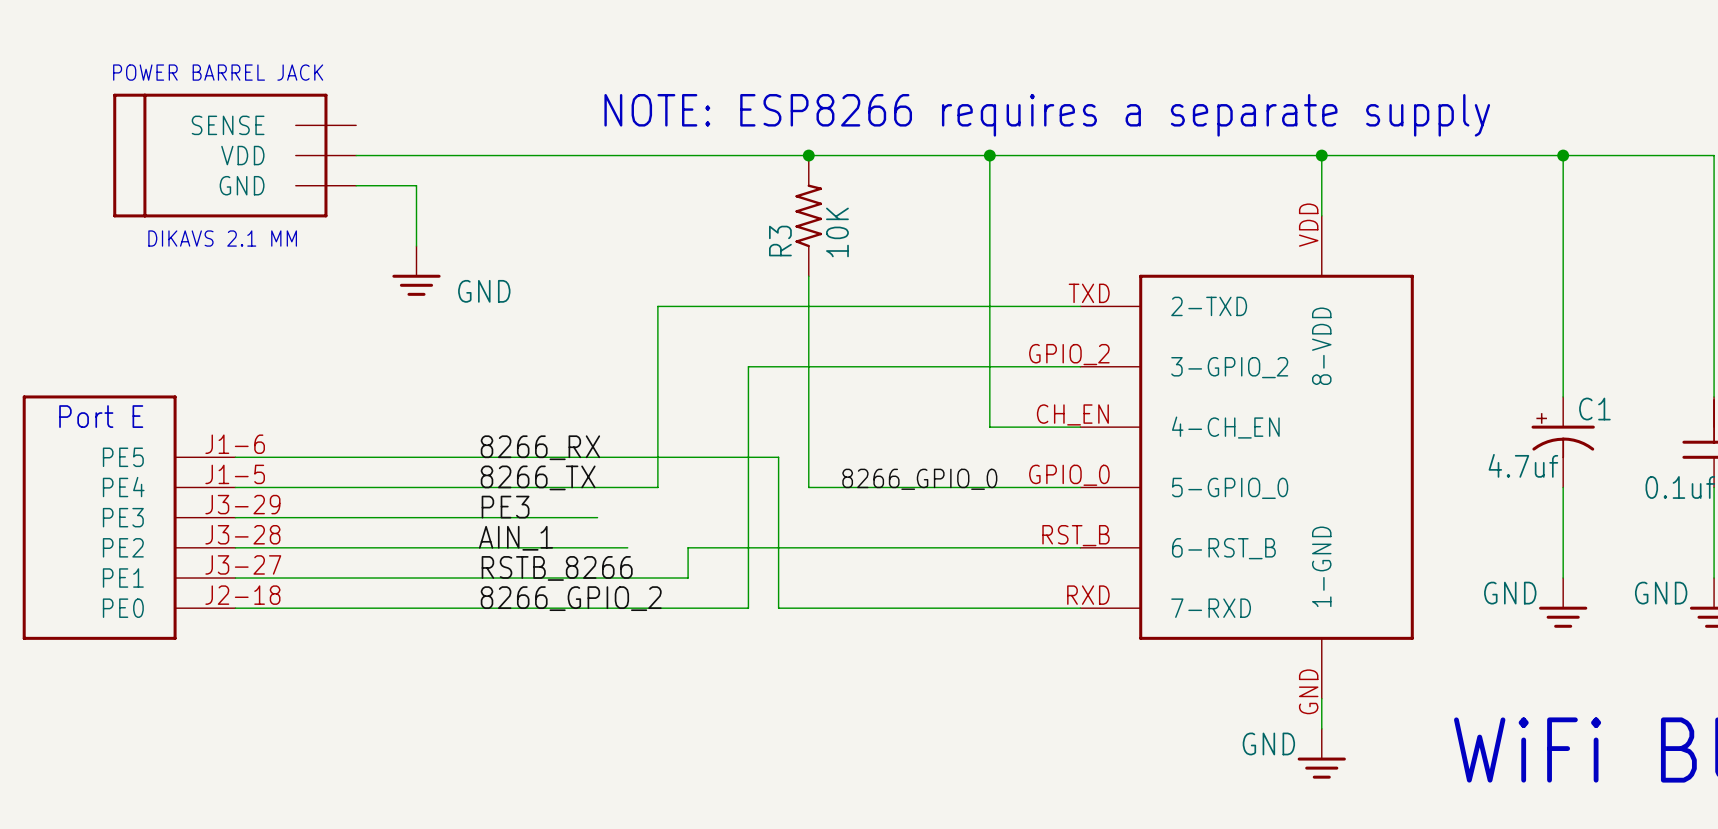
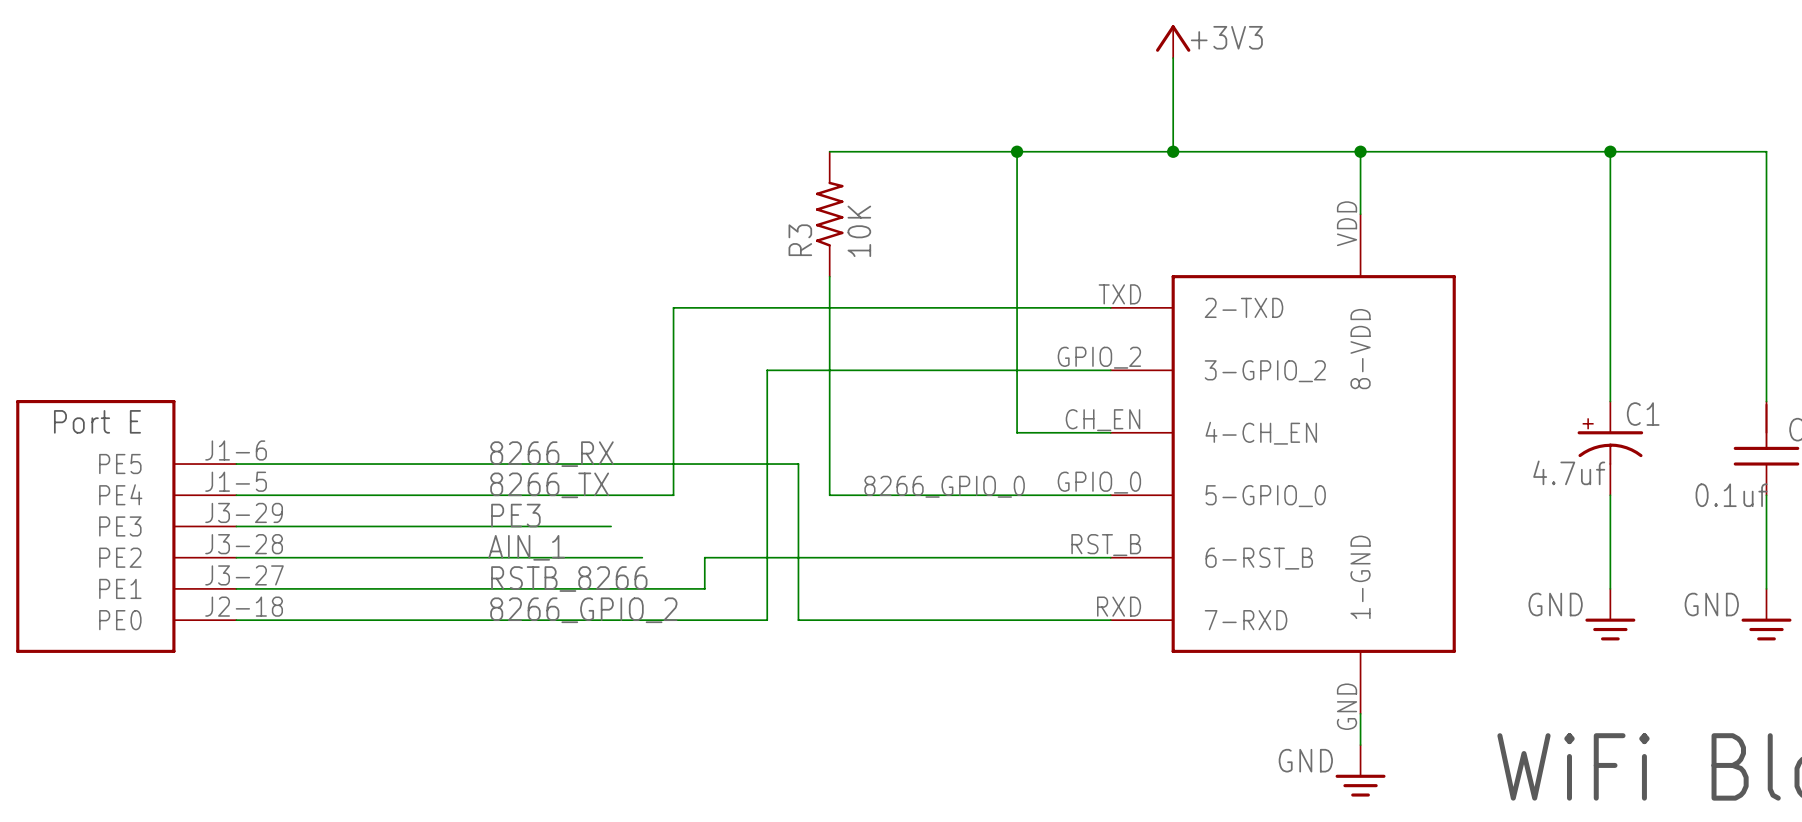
power symbol: none -> +3V3 (1173, 41)
wire: none -> (1173, 58) (1173, 151)
text: NOTE: ESP8266 requires a separate supply (1047, 115) -> none
part: (234, 155) -> none
wire: (356, 155) (808, 155) -> none
junction: (808, 155) -> none
junction: none -> (1173, 151)
wire: (356, 185) (416, 185) (416, 246) -> none
power symbol: GND (416, 270) -> none

